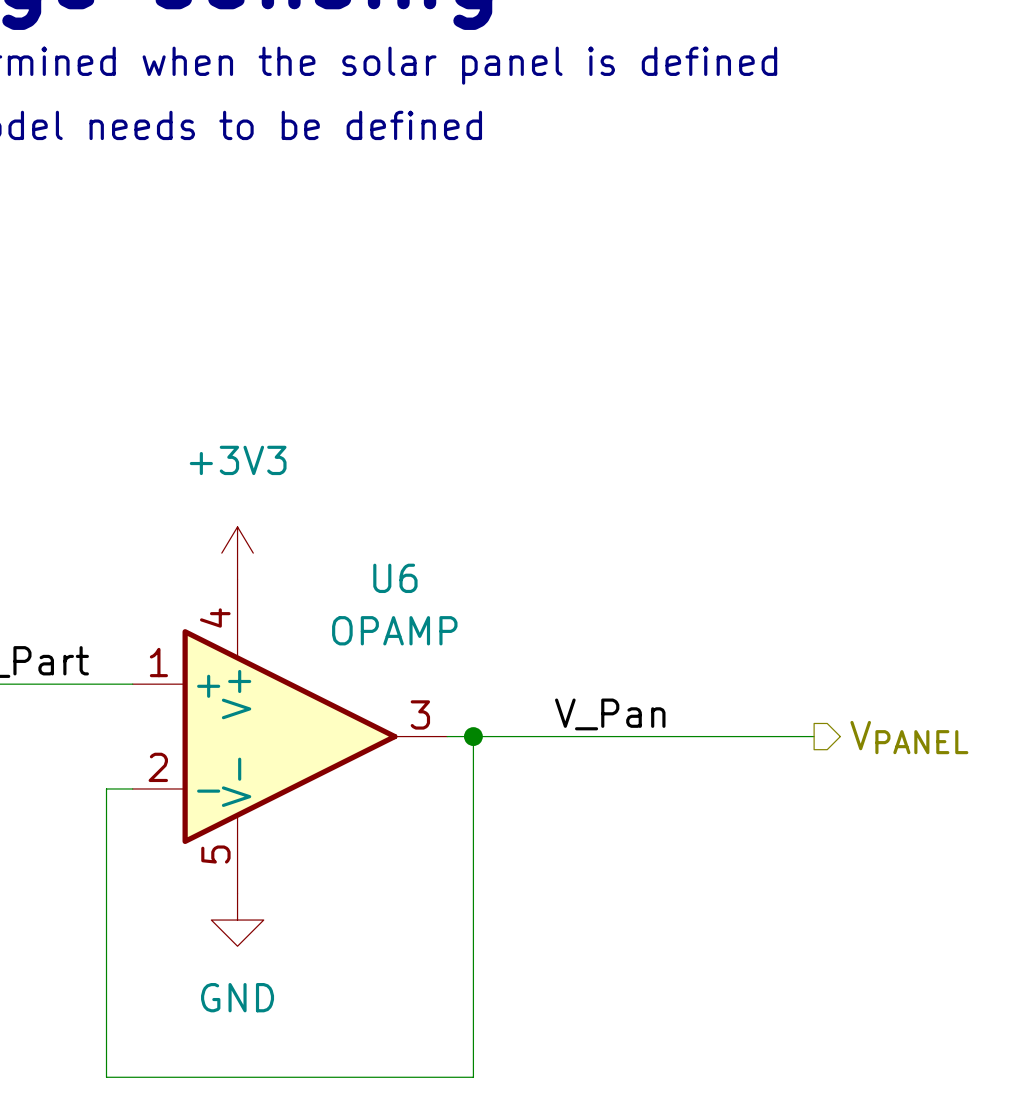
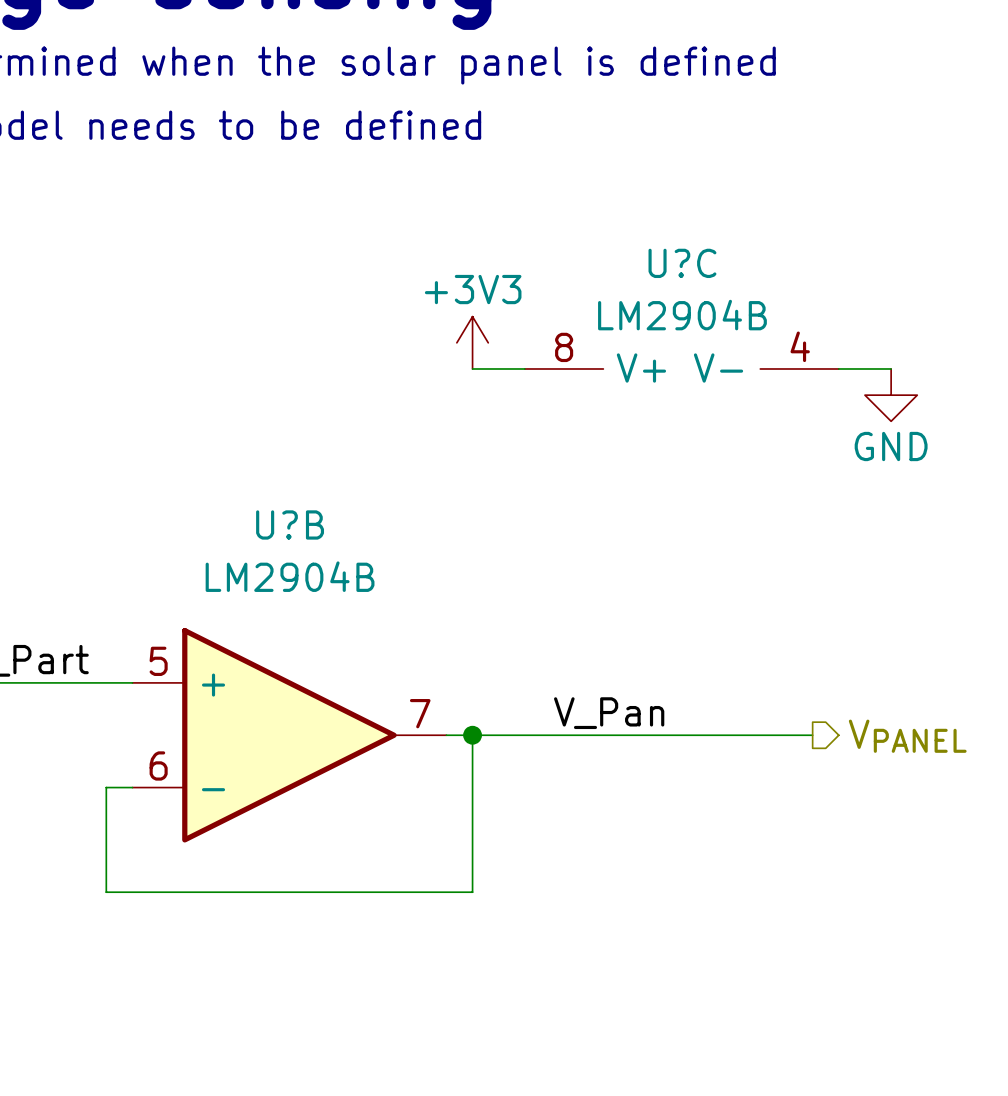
wire: none -> (472, 368) (524, 368)
U?C: none -> LM2904B (681, 368)
wire: none -> (838, 368) (891, 368)
power symbol: none -> GND (891, 395)
power symbol text position: +3V3 (238, 460) -> +3V3 (473, 289)
power symbol position: +3V3 (237, 553) -> +3V3 (472, 342)
U6: OPAMP (289, 736) -> none
U?B: none -> LM2904B (289, 735)
wire: (106, 893) (106, 1077) (473, 1077) (473, 893) -> (106, 892) (472, 892)
power symbol: GND (237, 920) -> none

